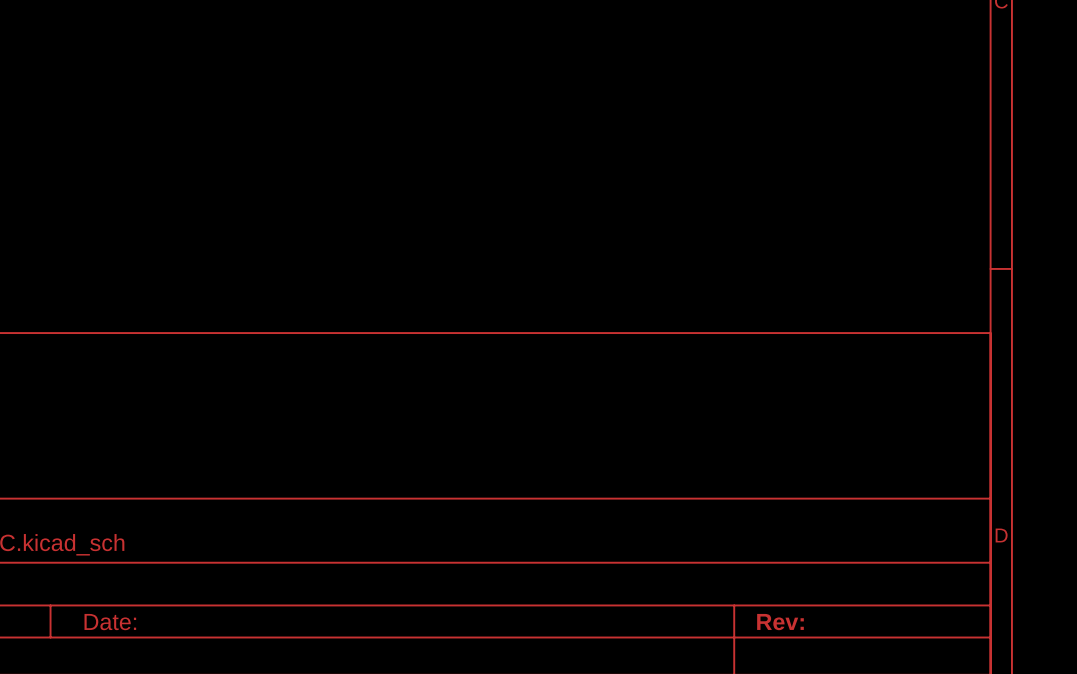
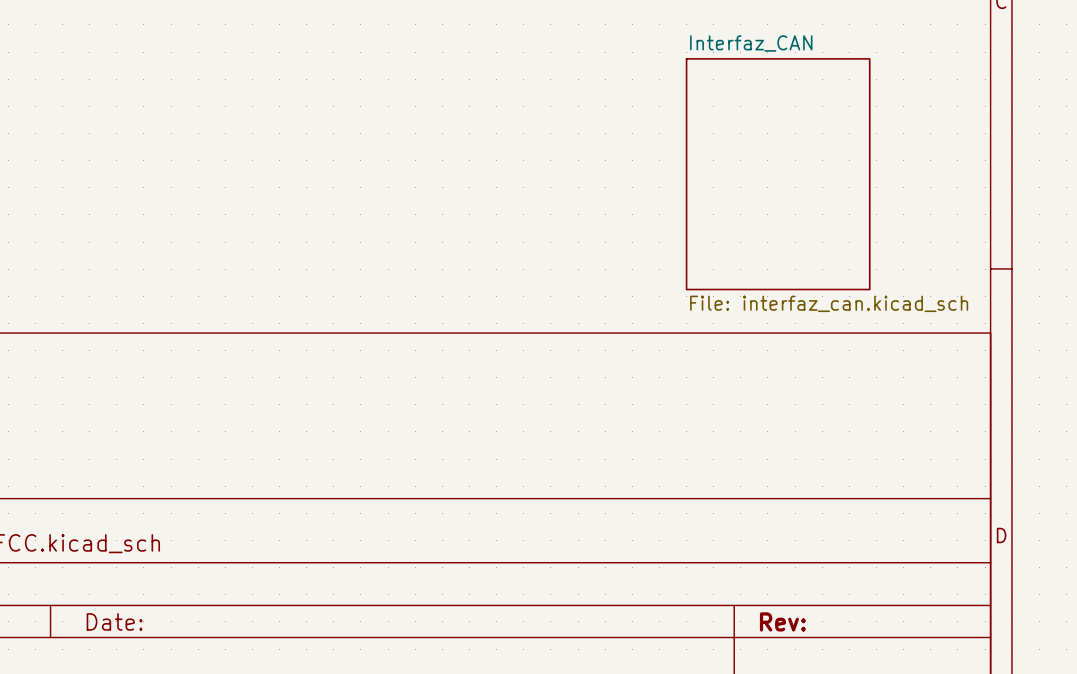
sheet Interfaz_CAN: none -> File: interfaz_can.kicad_sch (778, 174)

